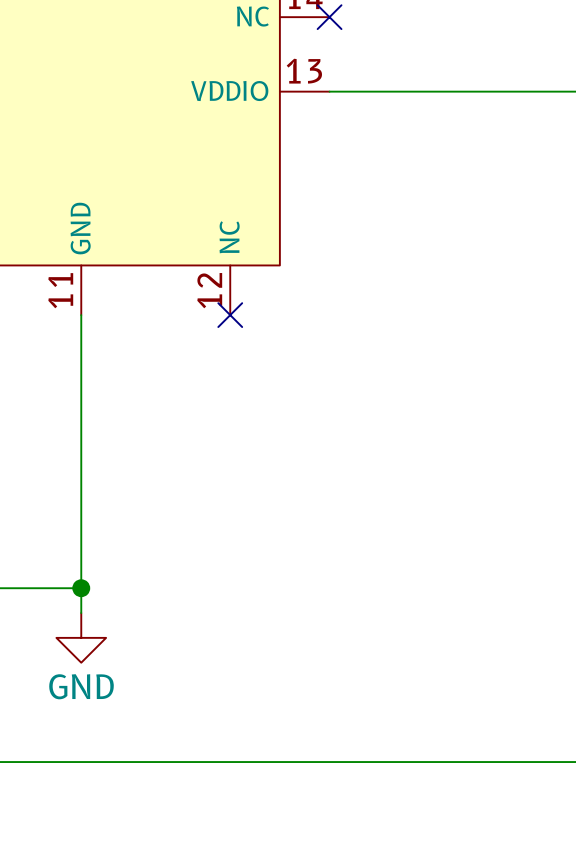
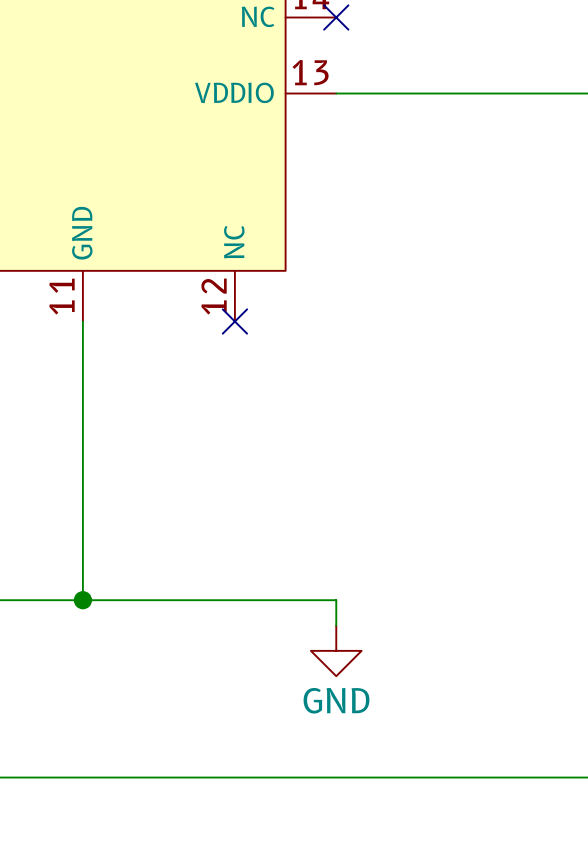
wire: (81, 588) (81, 613) -> (82, 600) (336, 600) (336, 625)
power symbol position: GND (81, 637) -> GND (336, 650)

